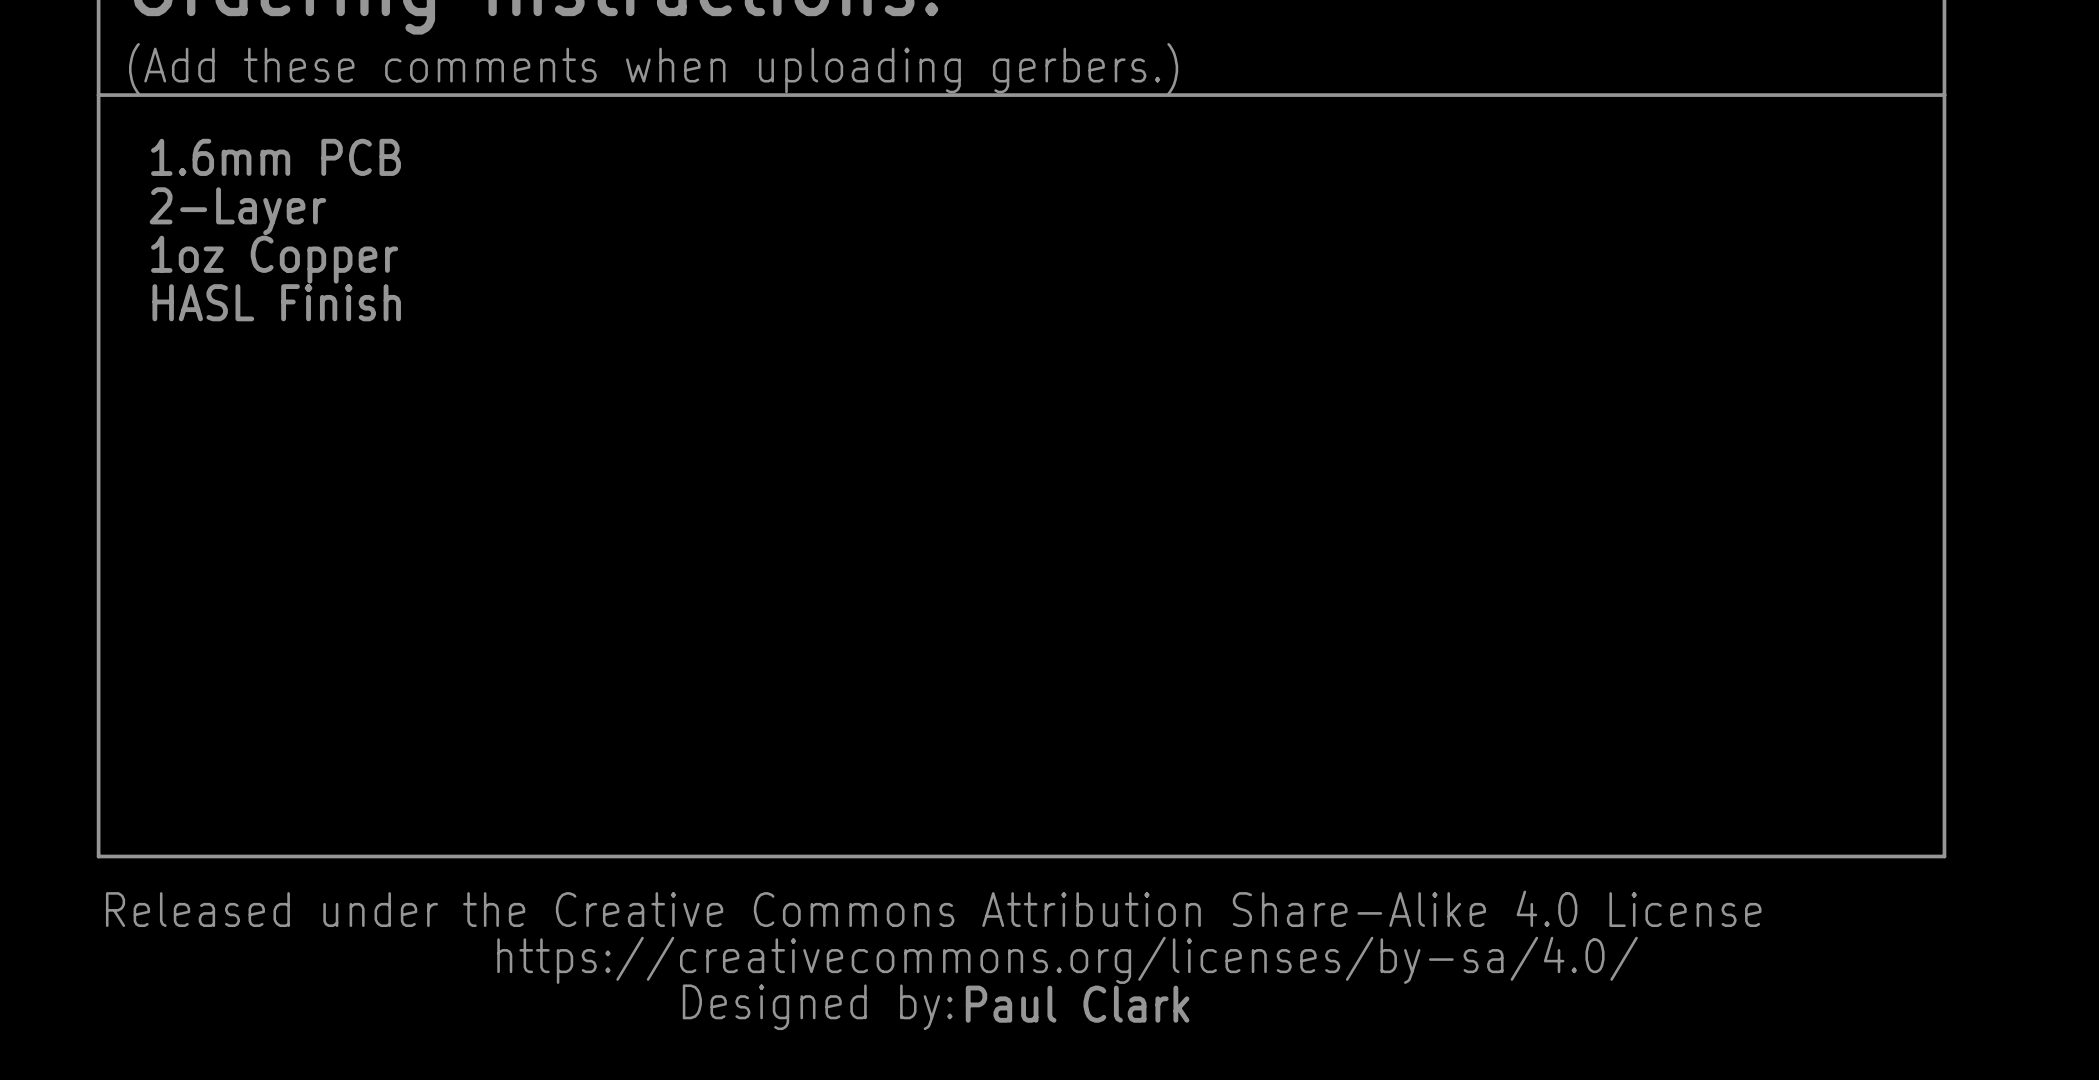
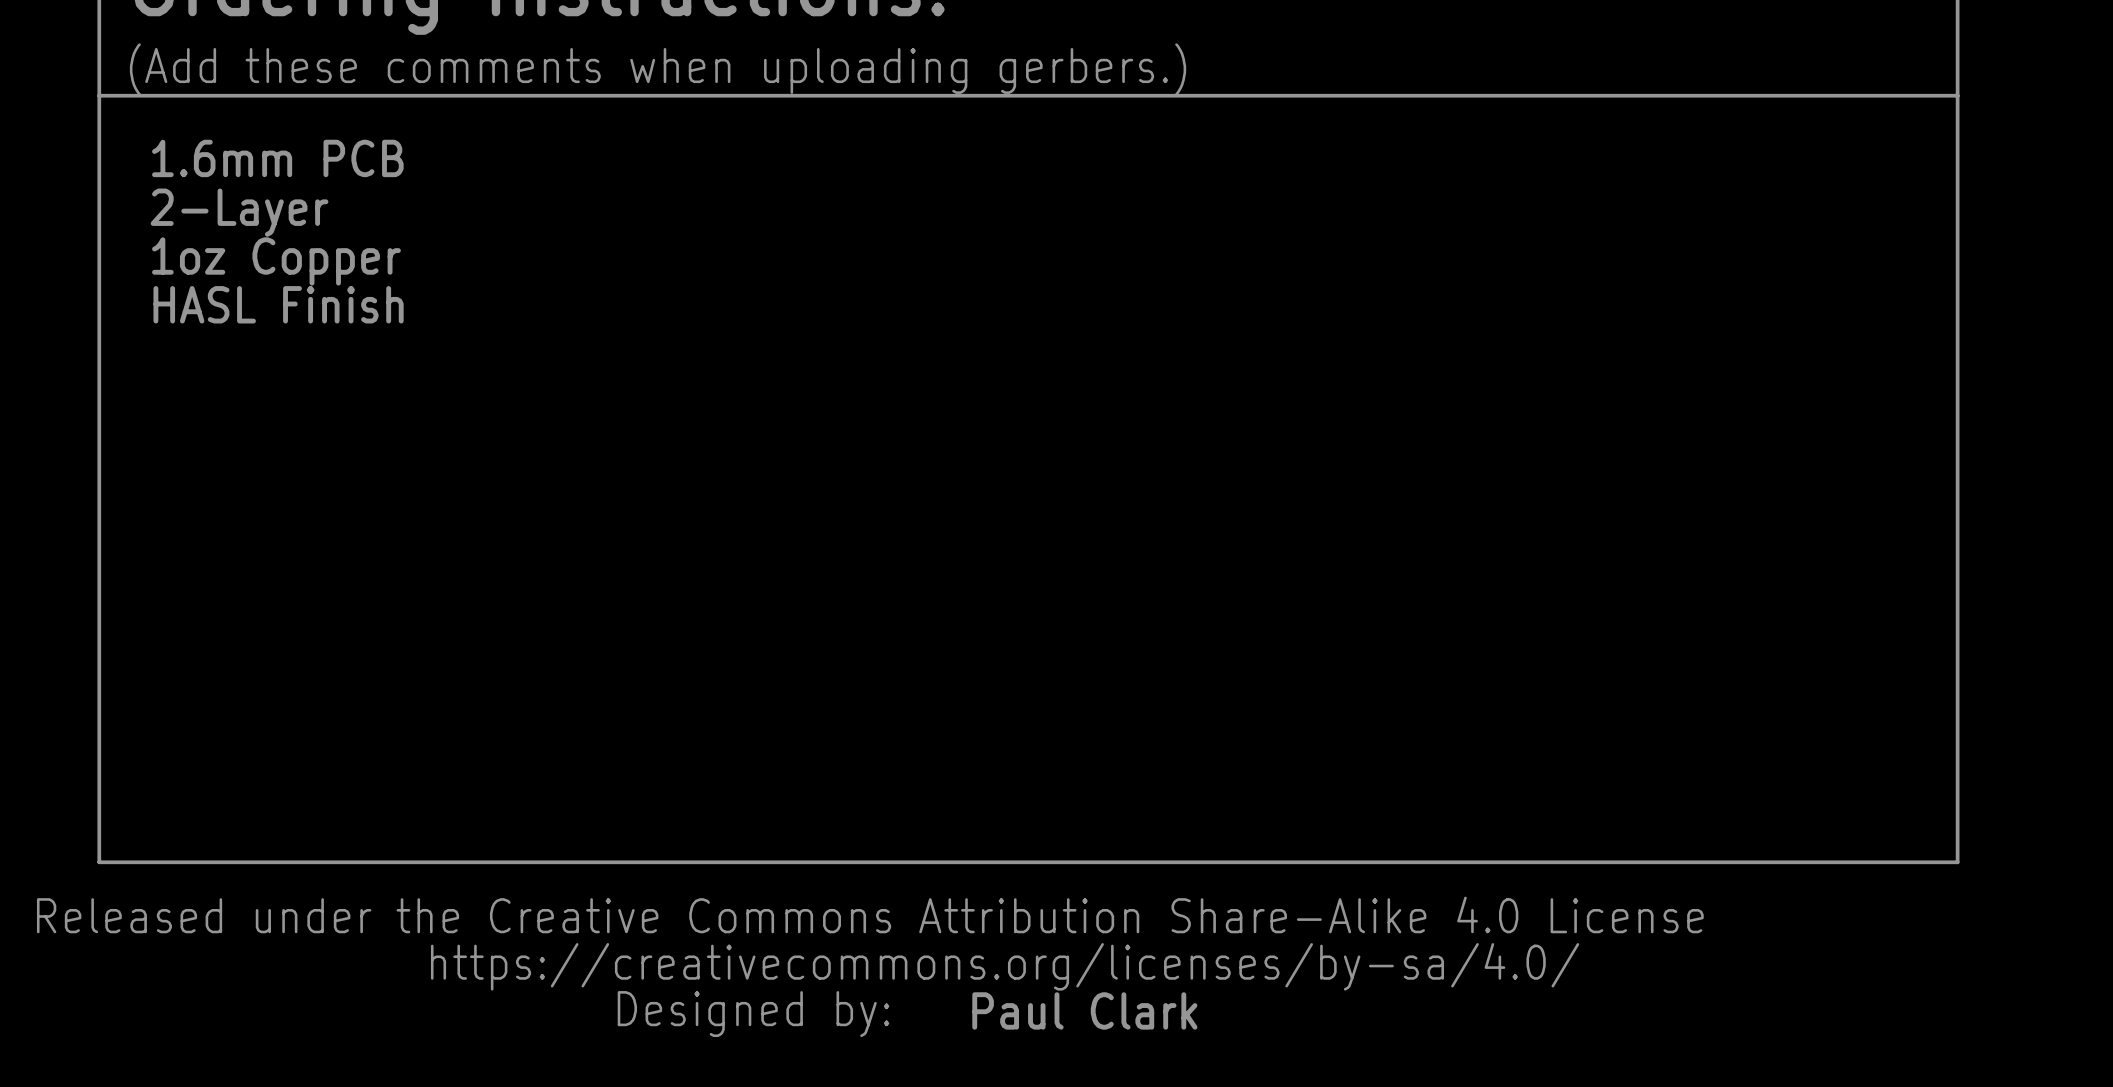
drawing position: (933, 960) -> (870, 966)

